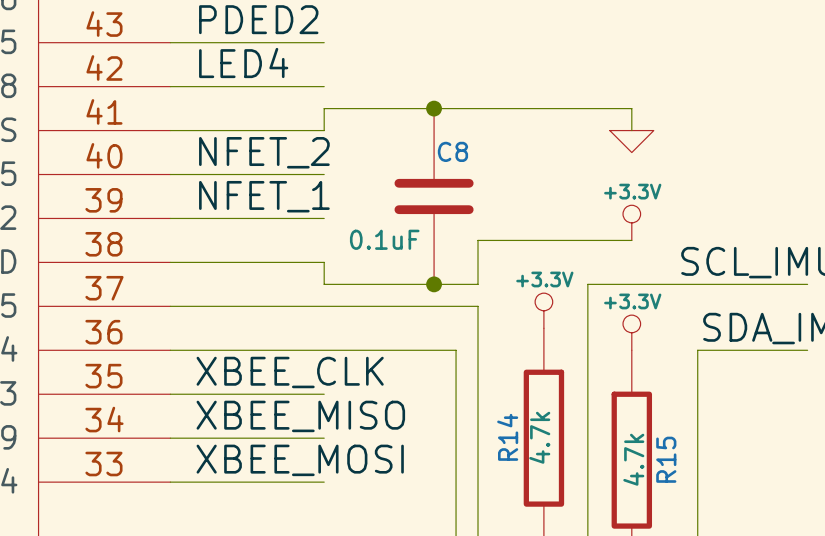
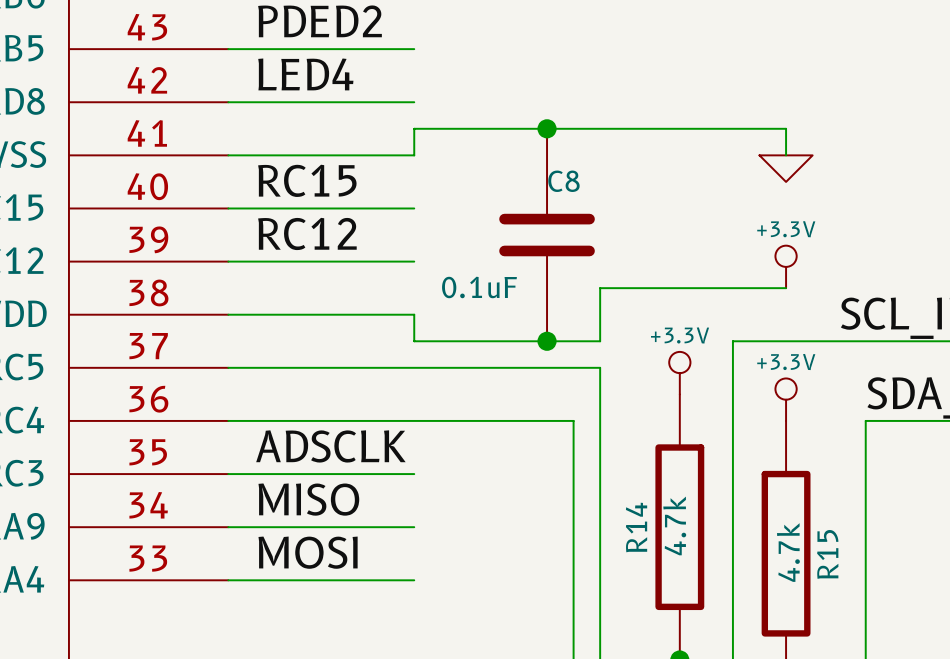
label: NFET_2 (264, 152) -> RC15 (307, 180)
label: NFET_1 (264, 196) -> RC12 (307, 233)
label: XBEE_CLK (290, 372) -> ADSCLK (330, 446)
label: XBEE_MISO (300, 416) -> MISO (308, 499)
label: XBEE_MOSI (300, 460) -> MOSI (308, 552)

